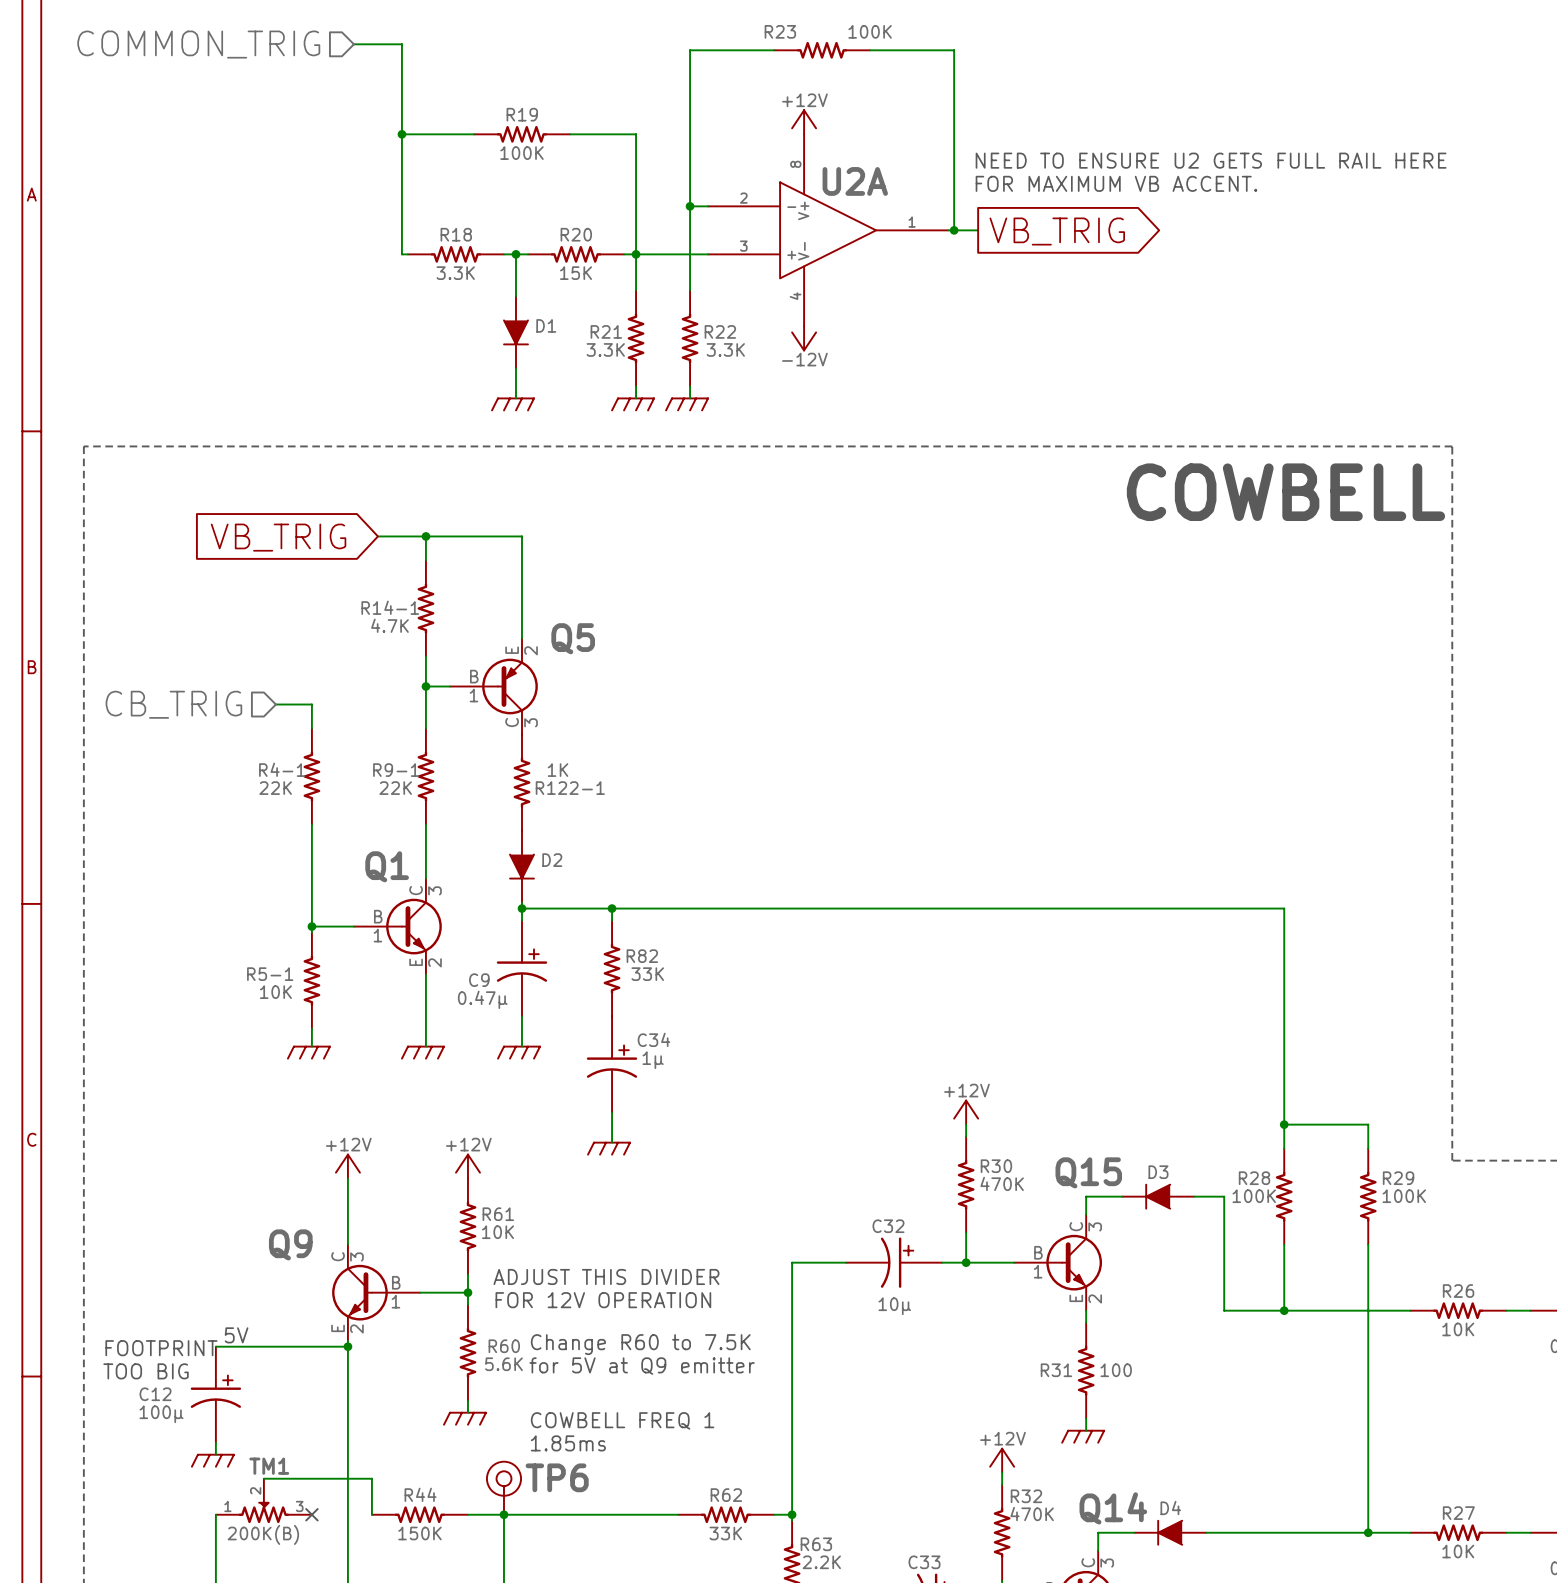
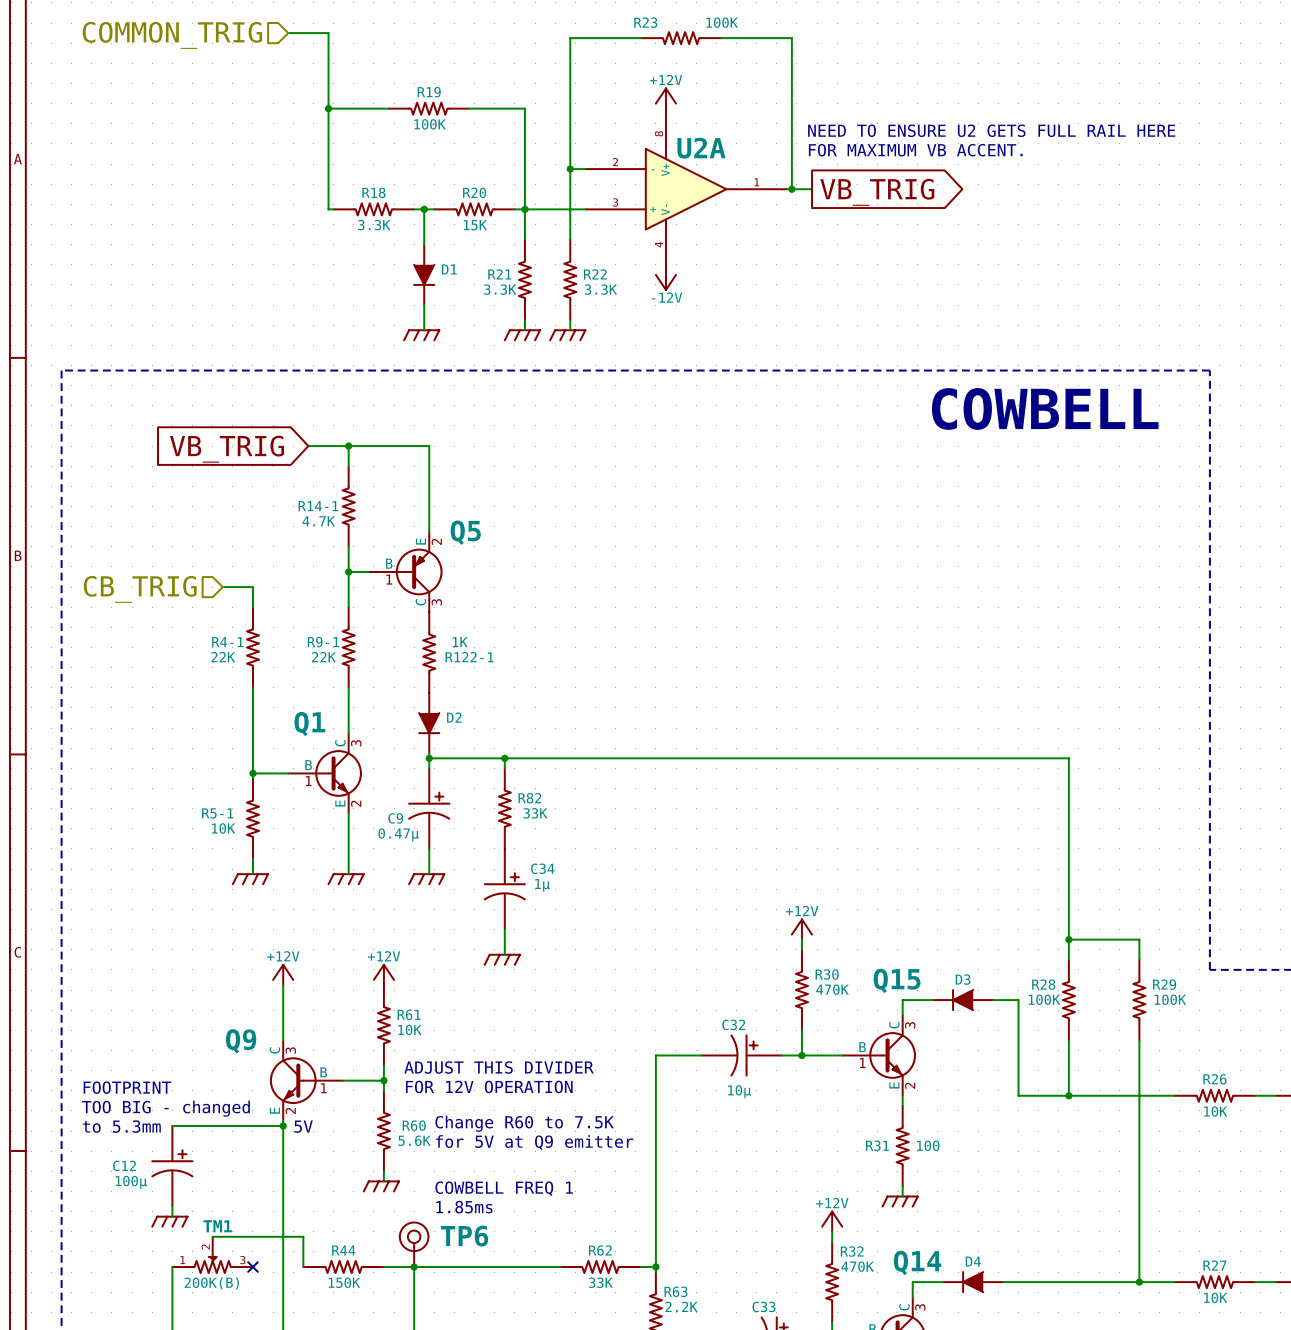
text: none -> FOOTPRINT (127, 1087)
text: none -> TOO BIG - changed (166, 1108)
text position: 5V (236, 1335) -> 5V (303, 1126)
text: FOOTPRINT (161, 1348) -> to 5.3mm (121, 1126)
text: TOO BIG (146, 1371) -> none

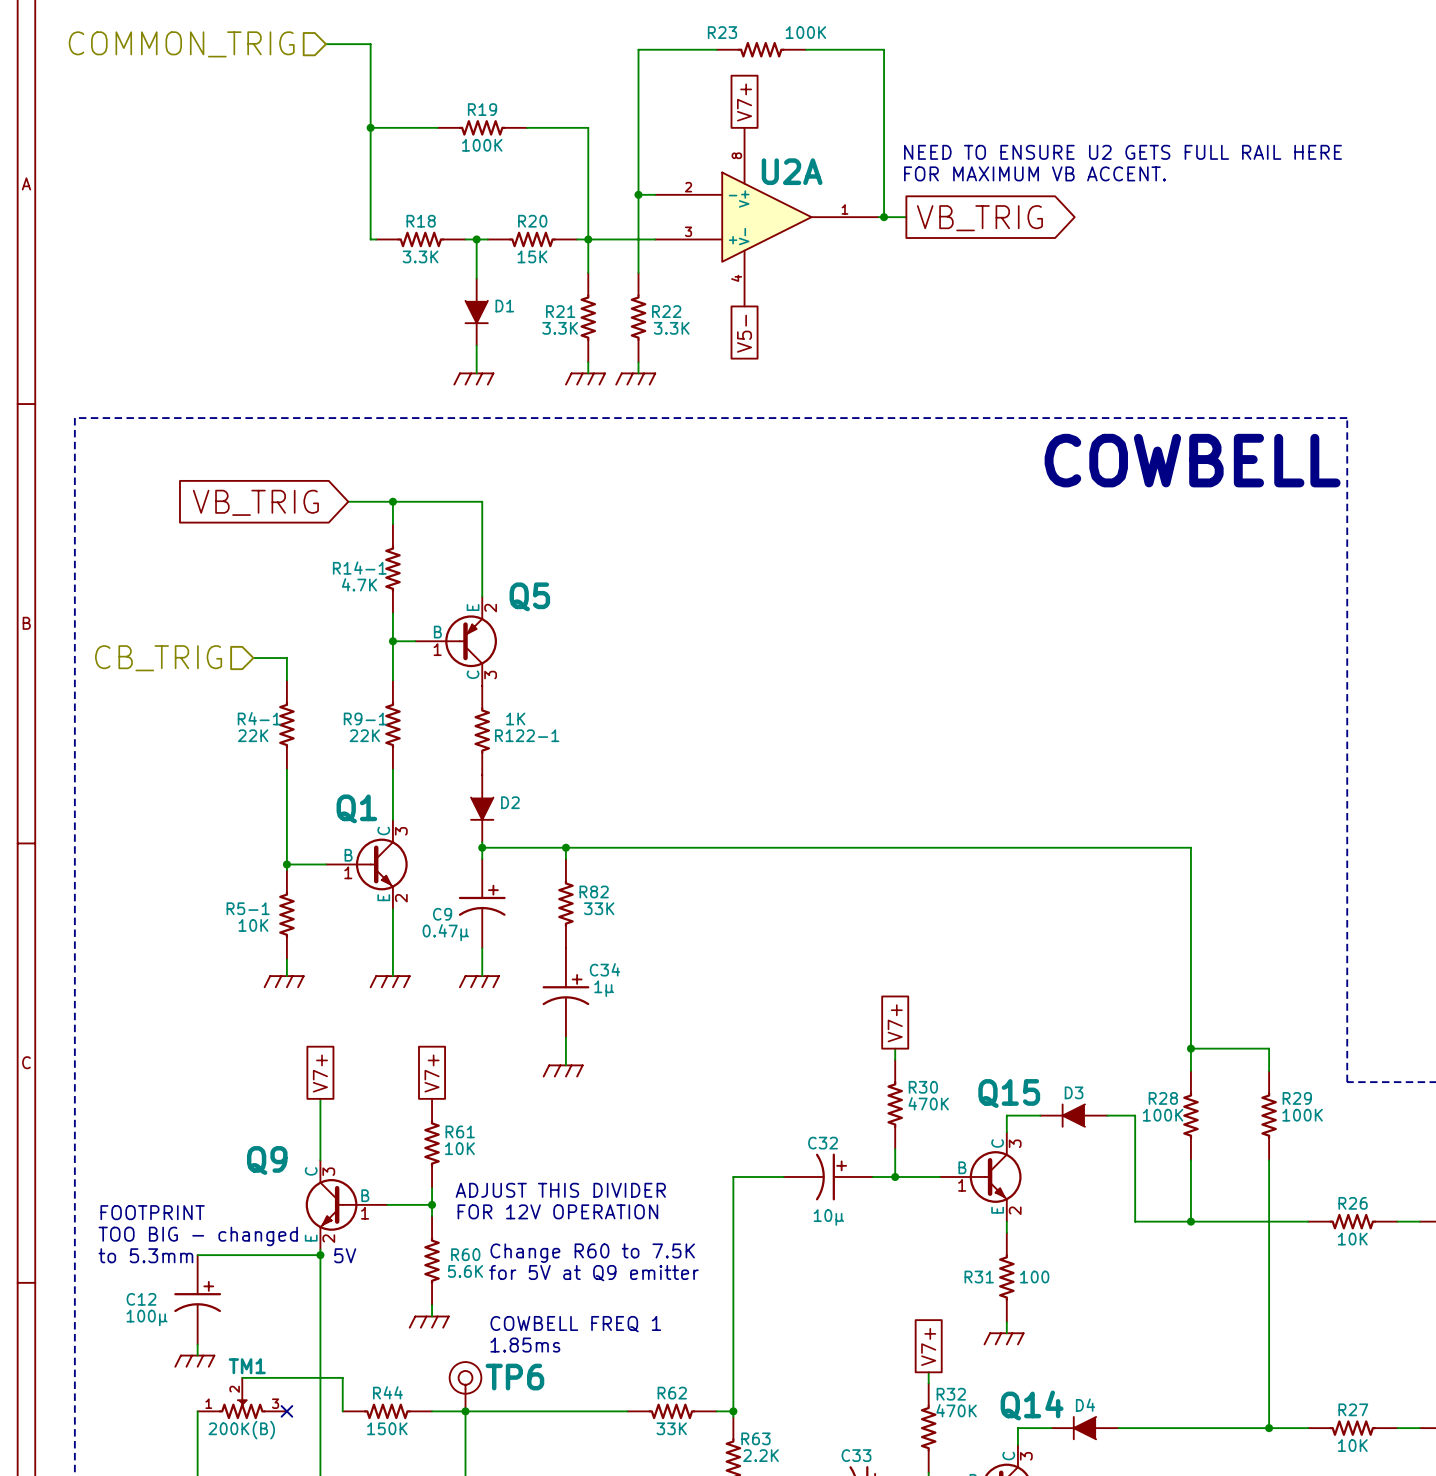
global label: none -> V7+ (744, 102)
power symbol: +12V (665, 98) -> none
power symbol: -12V (665, 279) -> none
global label: none -> V5- (744, 333)
global label: none -> V7+ (895, 1023)
power symbol: +12V (801, 929) -> none
global label: none -> V7+ (320, 1073)
global label: none -> V7+ (432, 1073)
power symbol: +12V (283, 974) -> none
power symbol: +12V (383, 974) -> none
global label: none -> V7+ (928, 1346)
power symbol: +12V (832, 1221) -> none

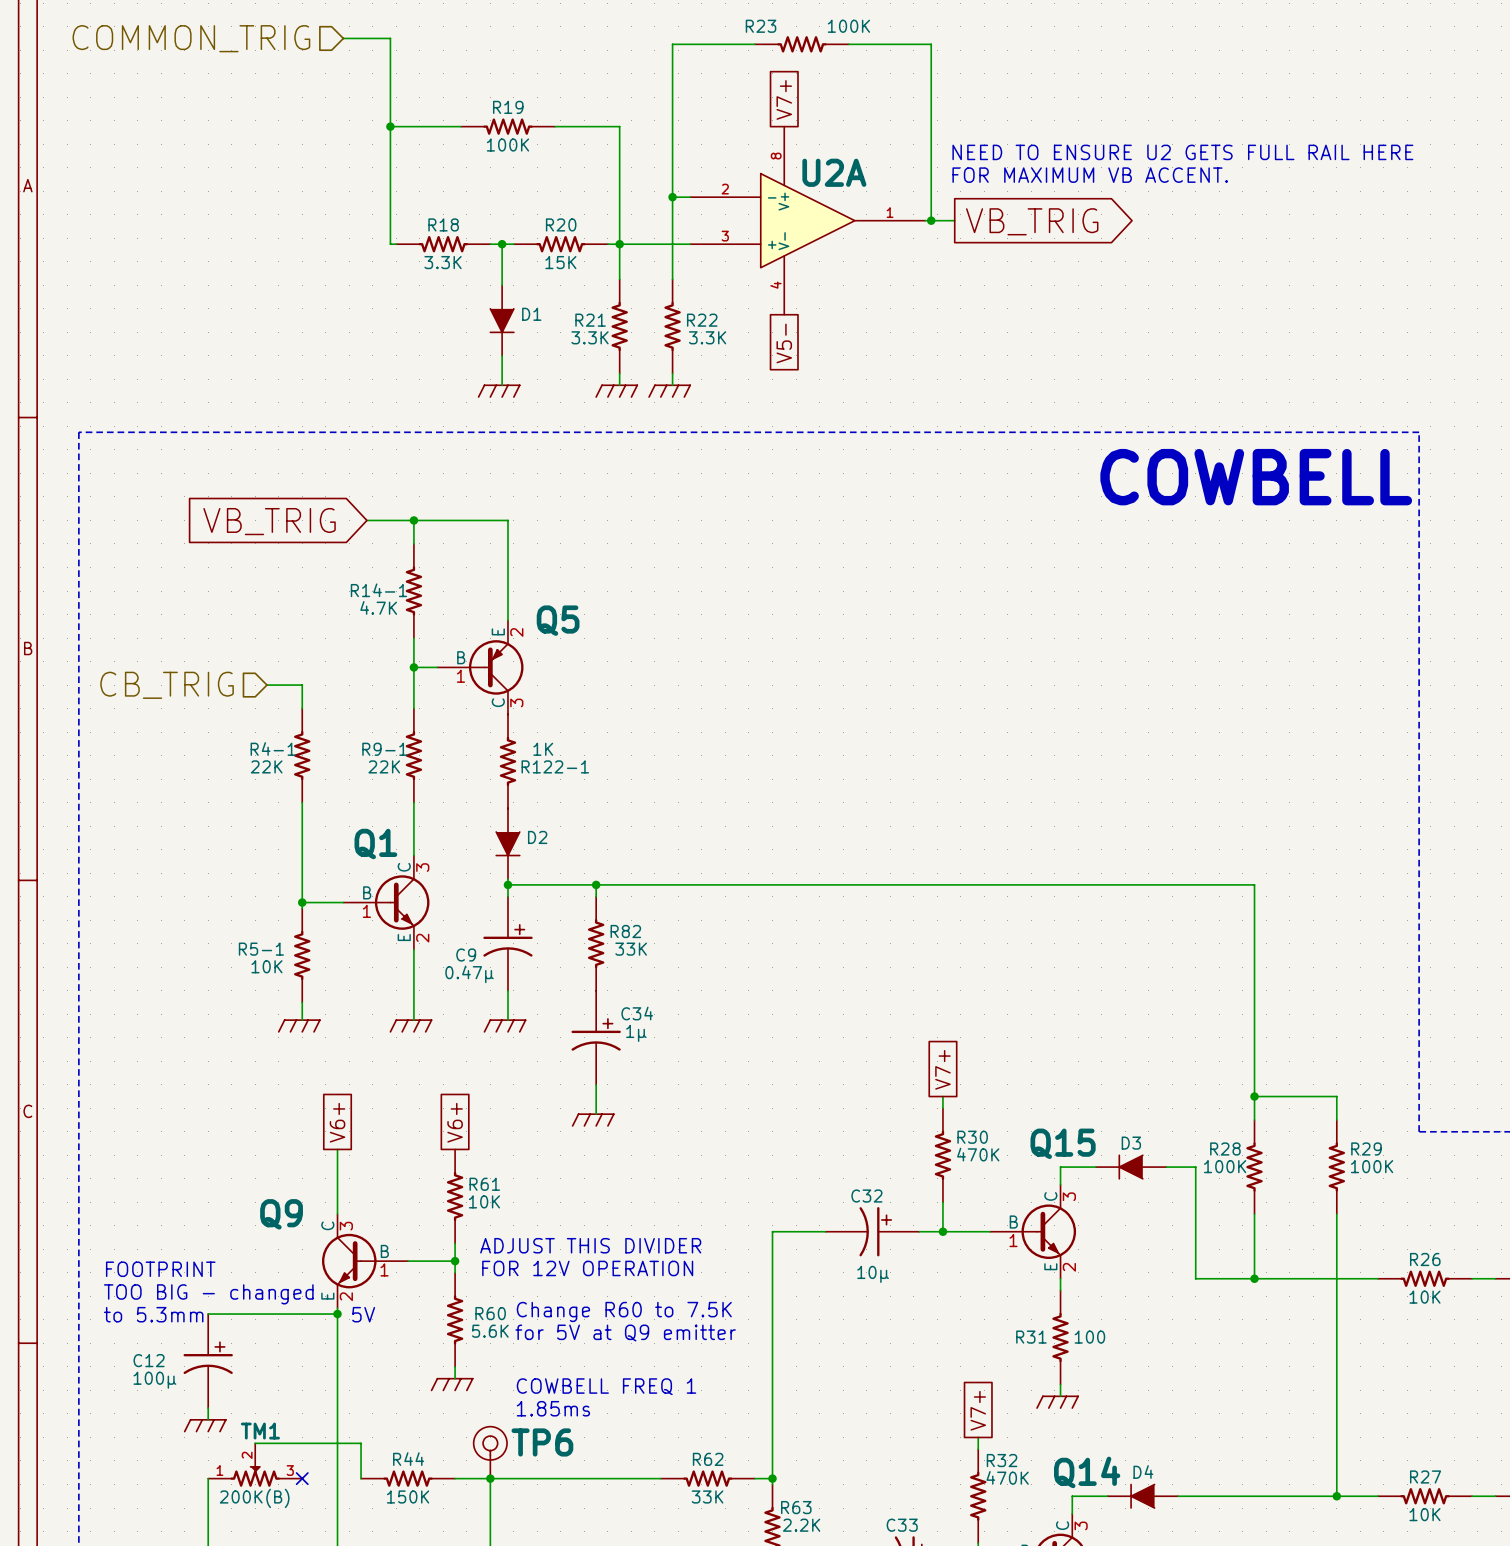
global label: V7+ (320, 1073) -> V6+ (337, 1122)
global label: V7+ (432, 1073) -> V6+ (455, 1122)

